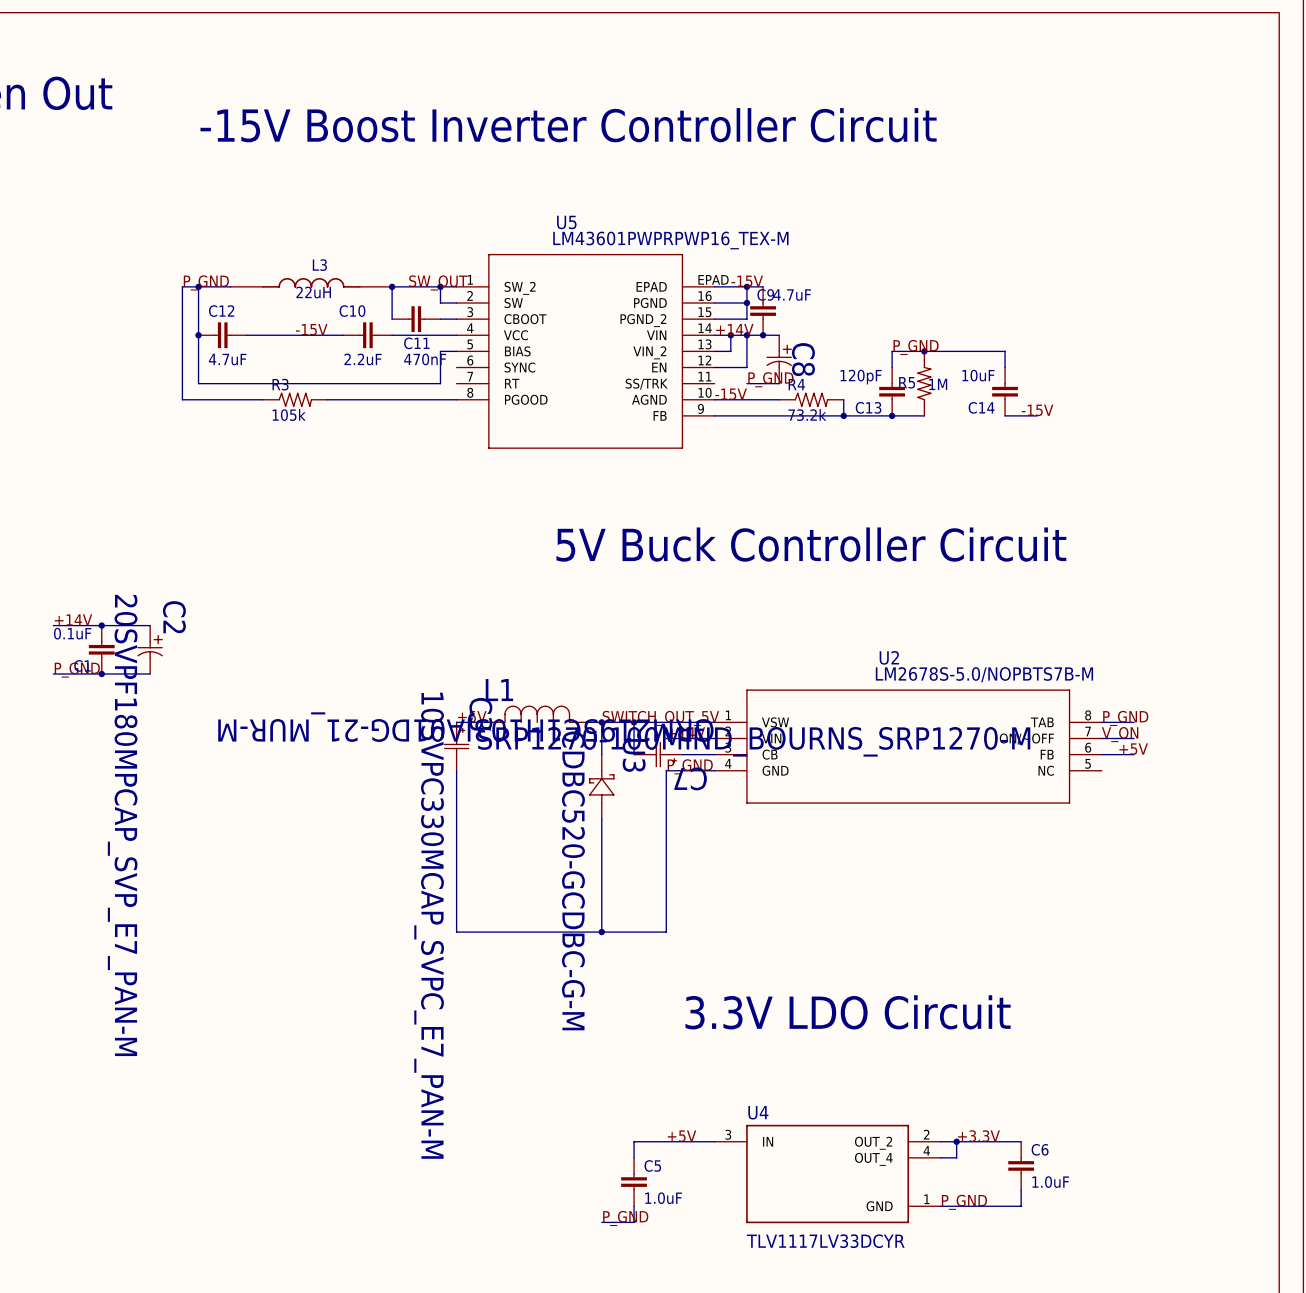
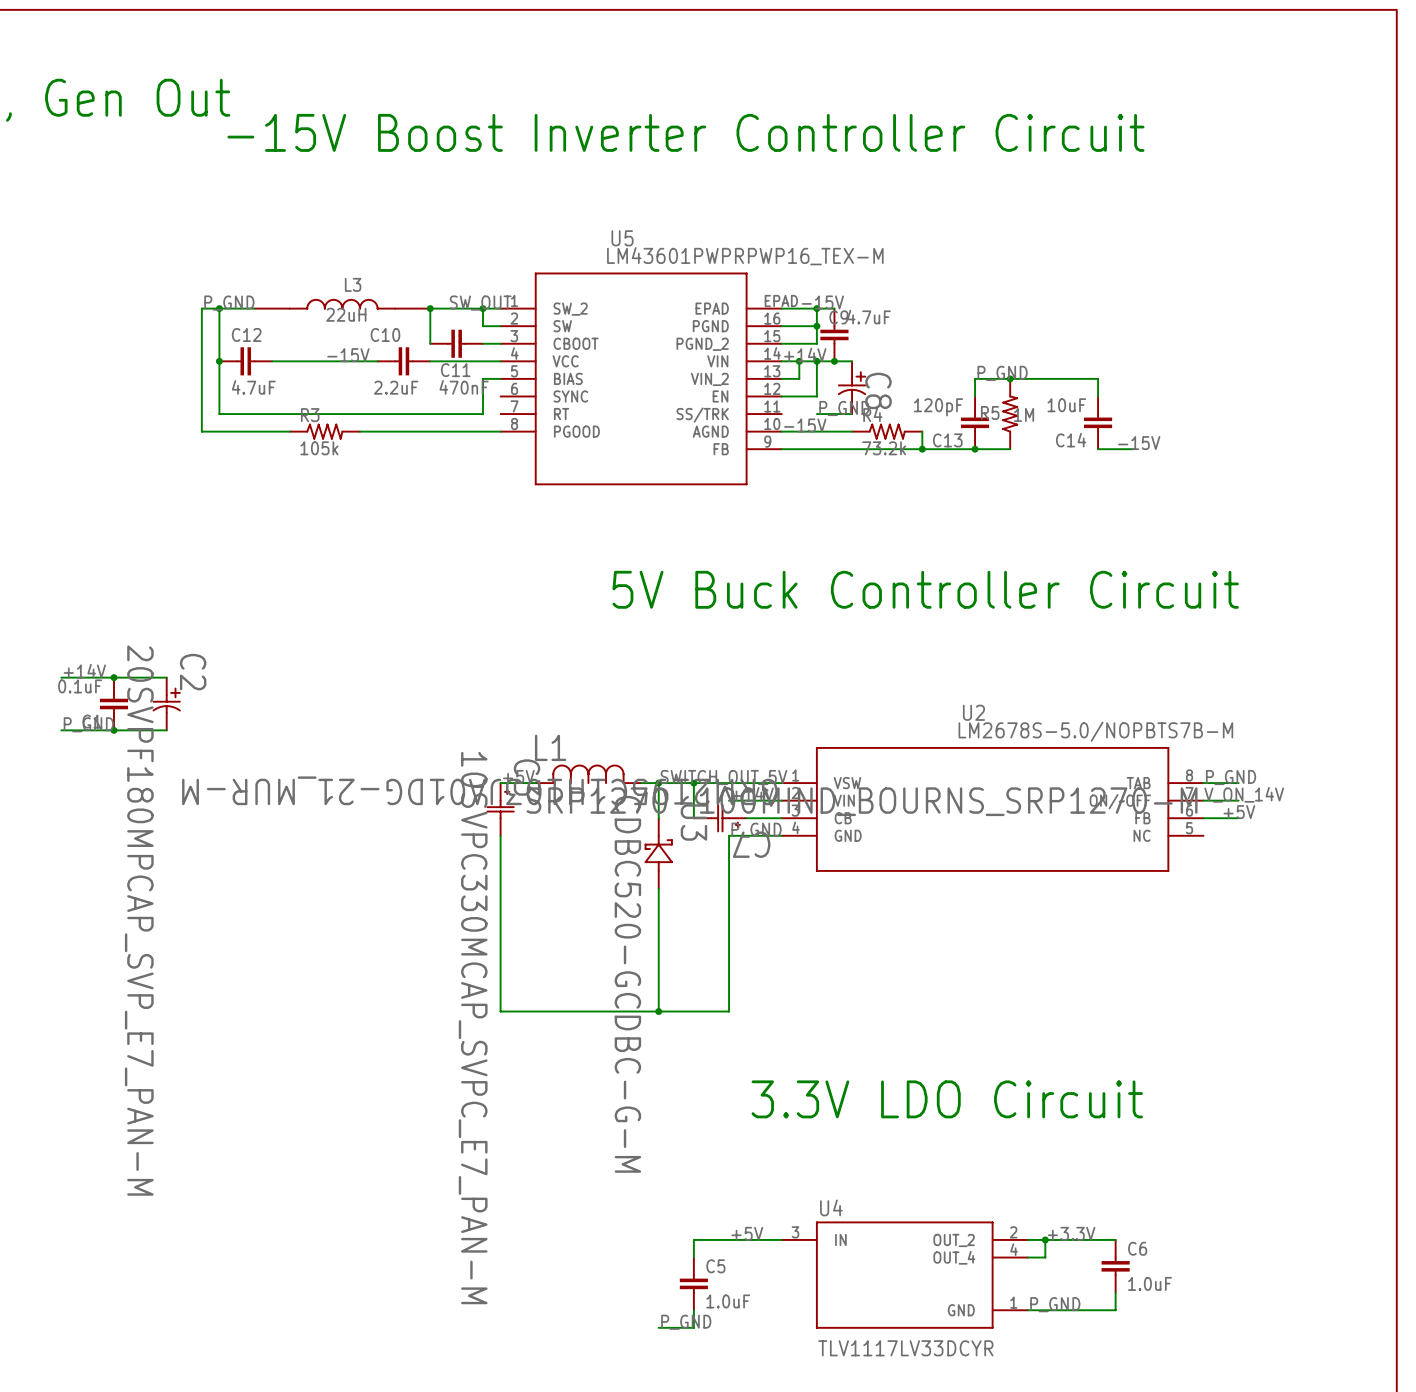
label: V_ON (1120, 734) -> V_ON_14V (1244, 794)

